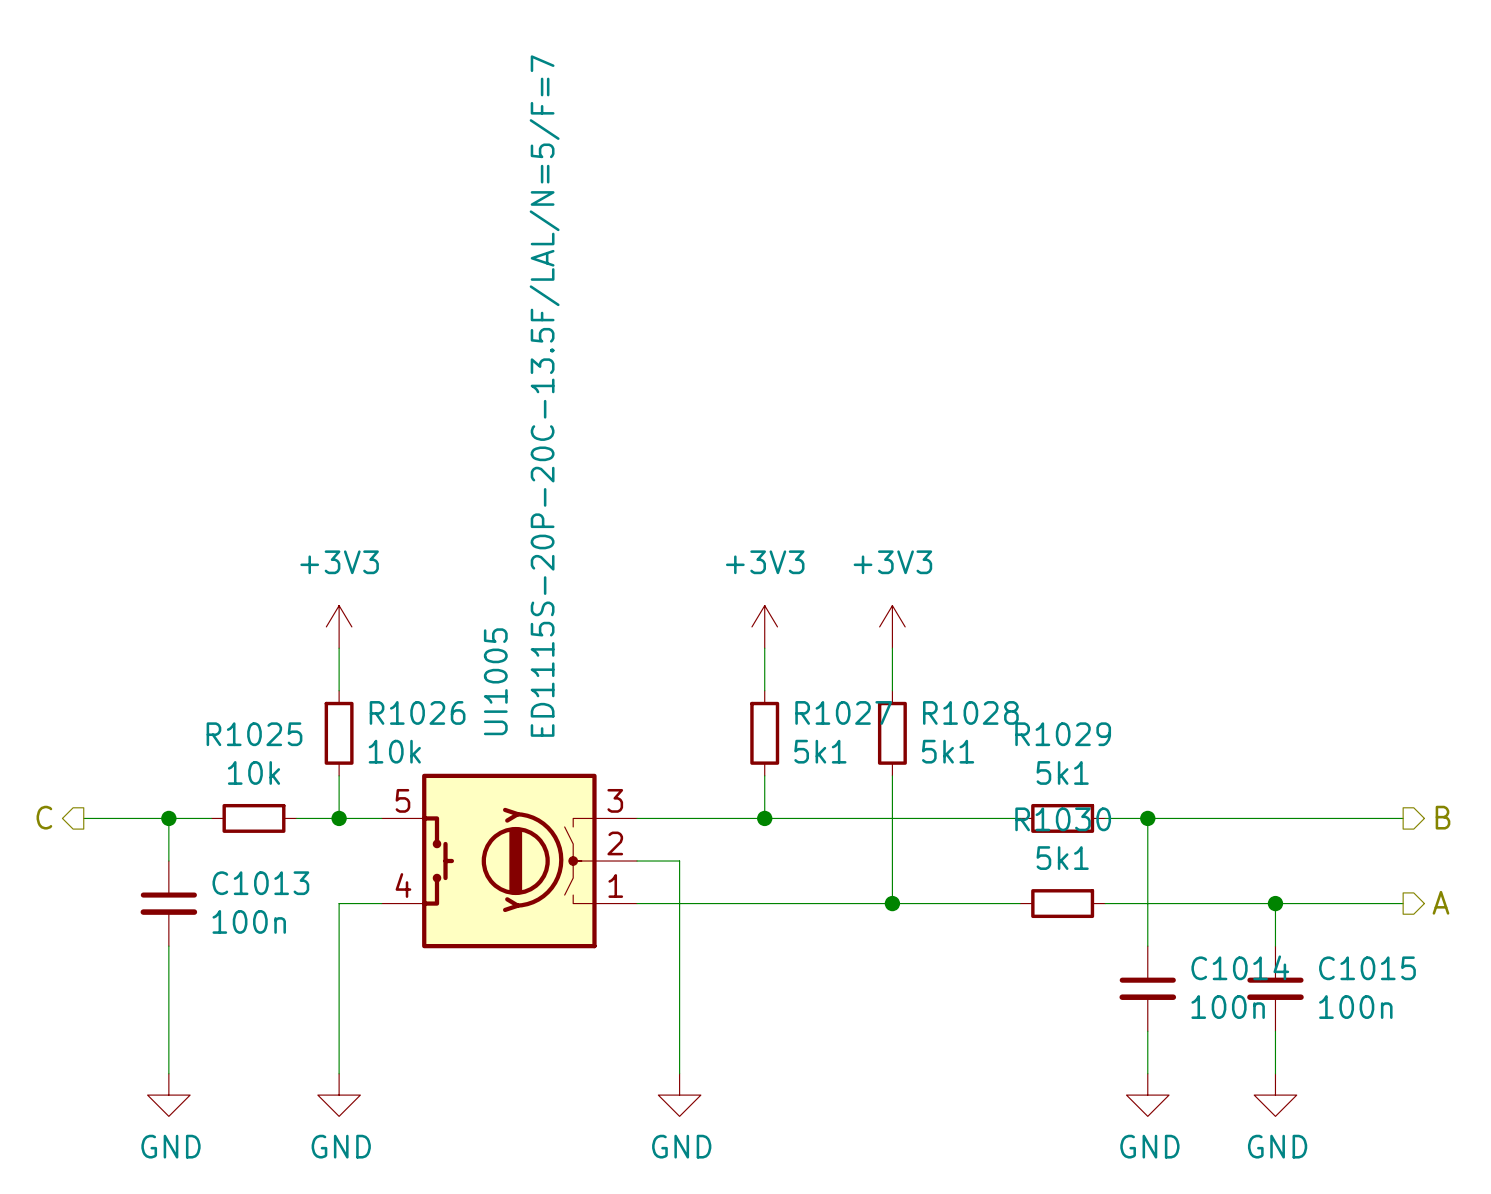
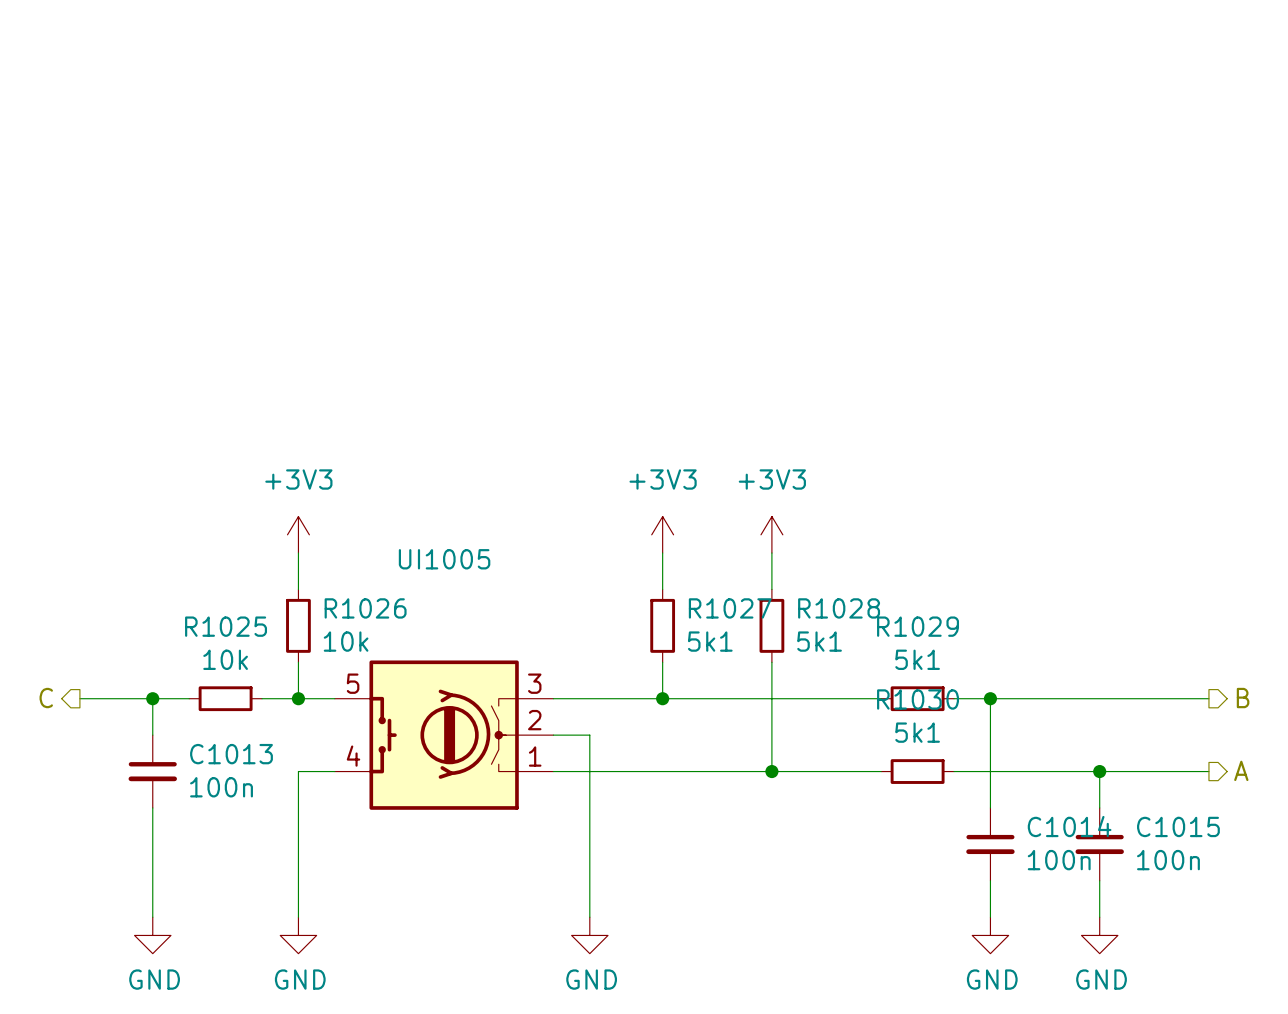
UI1005 value: ED1115S-20P-20C-13.5F/LAL/N=5/F=7 (544, 396) -> none
UI1005 name rotation: 0° (495, 681) -> 90° clockwise (444, 559)

